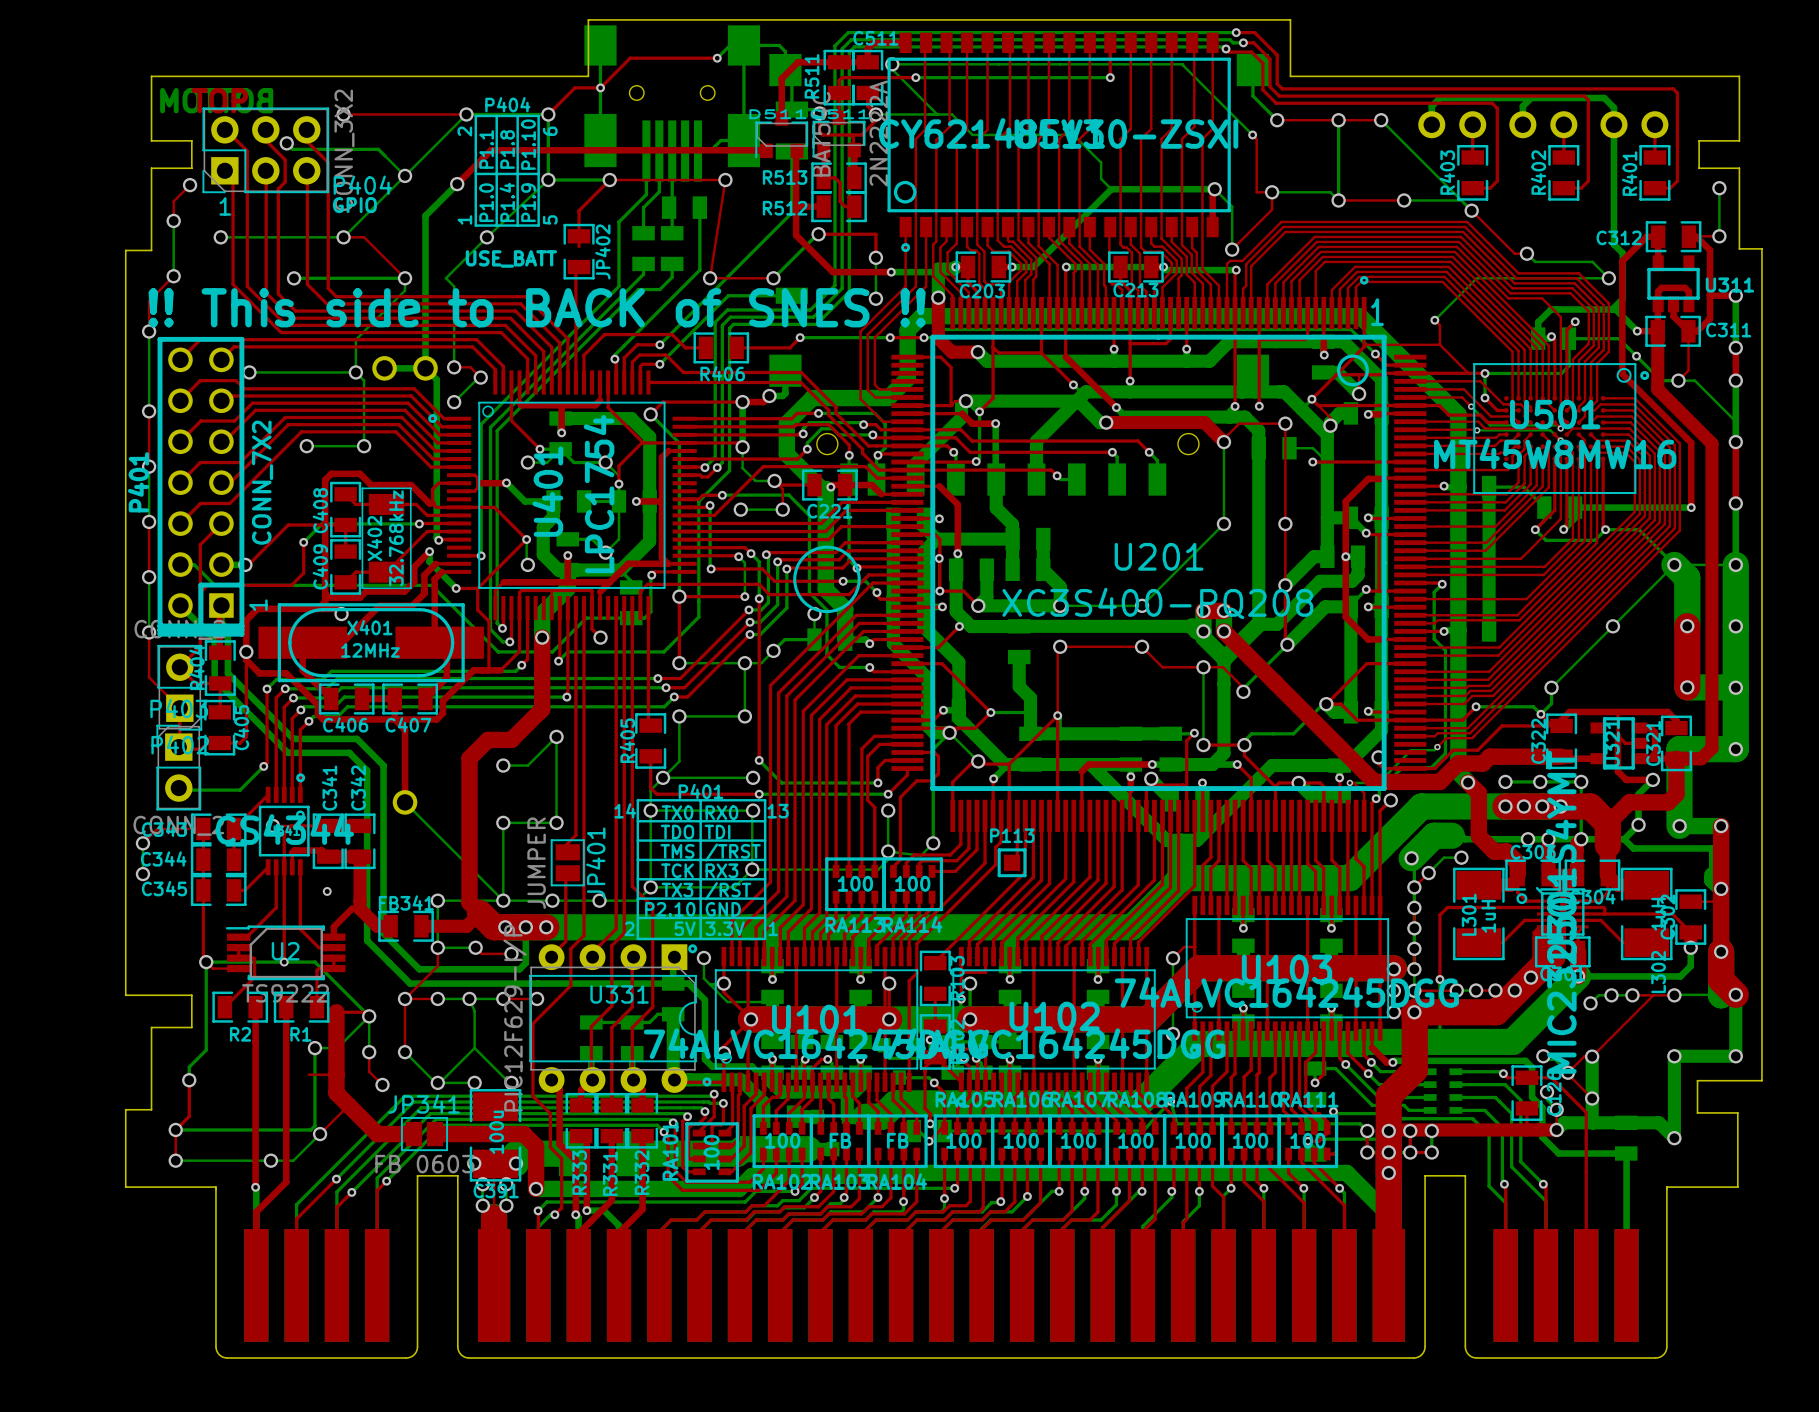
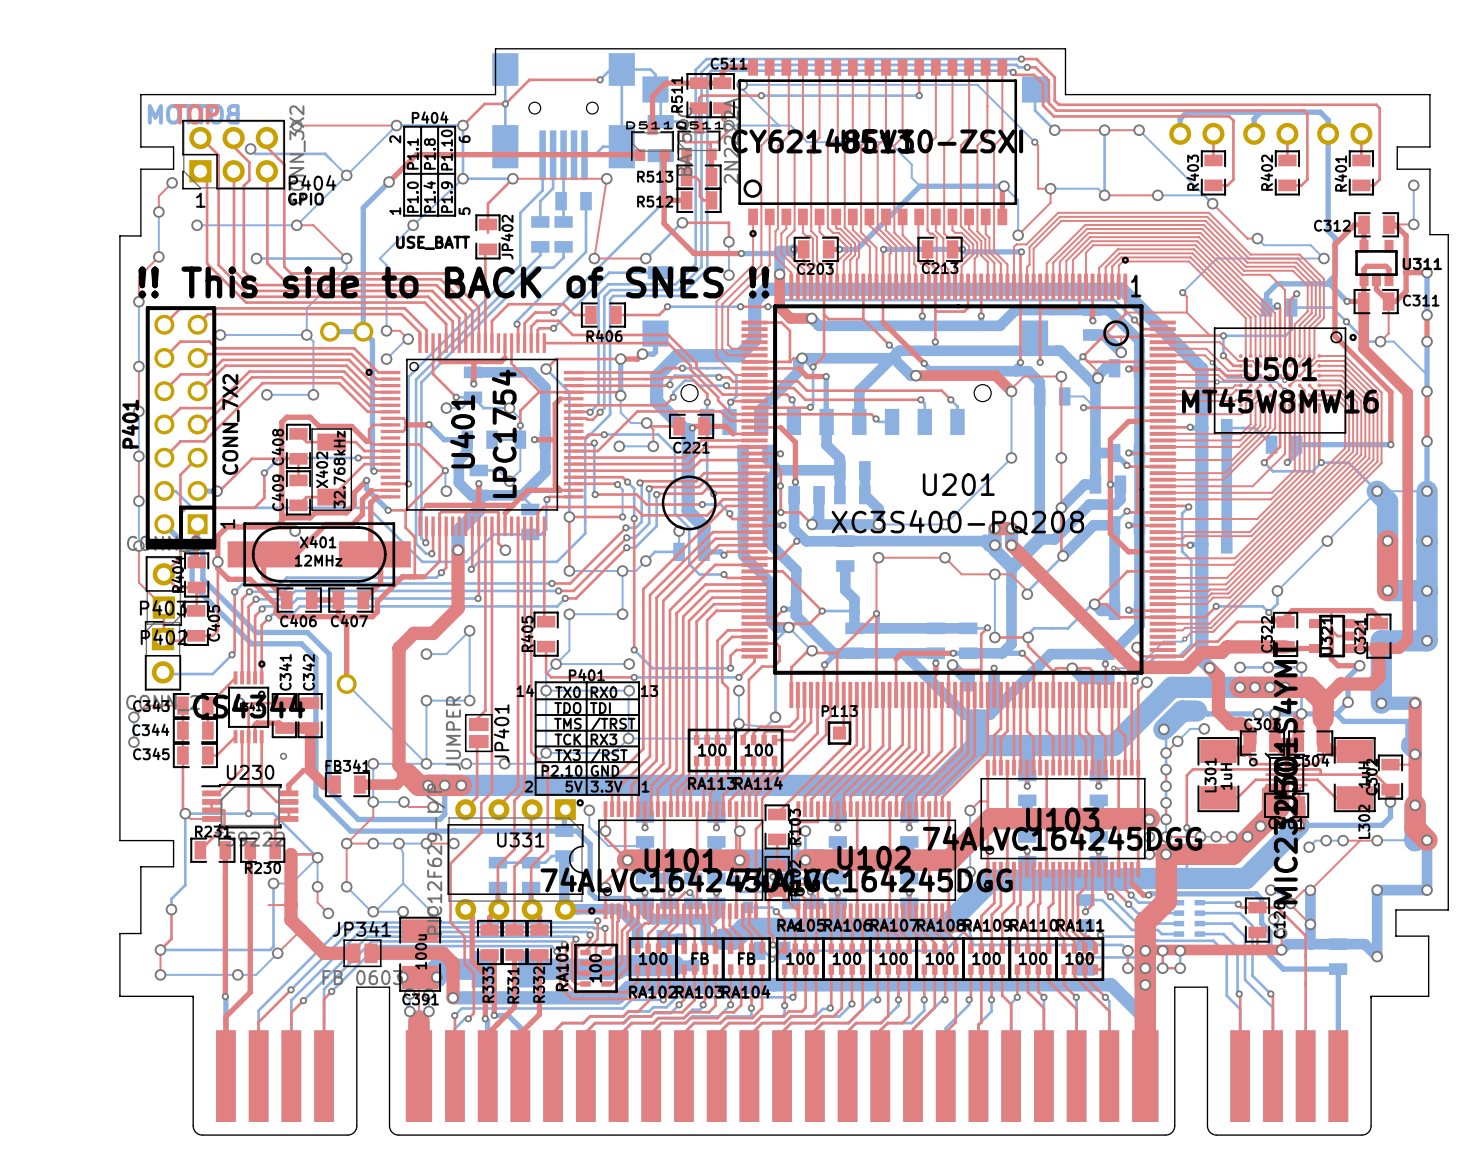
U2 name: U2 (285, 951) -> U230 (250, 772)
R2 name: R2 (240, 1034) -> R231 (213, 831)
R1 name: R1 (300, 1034) -> R230 (262, 868)

